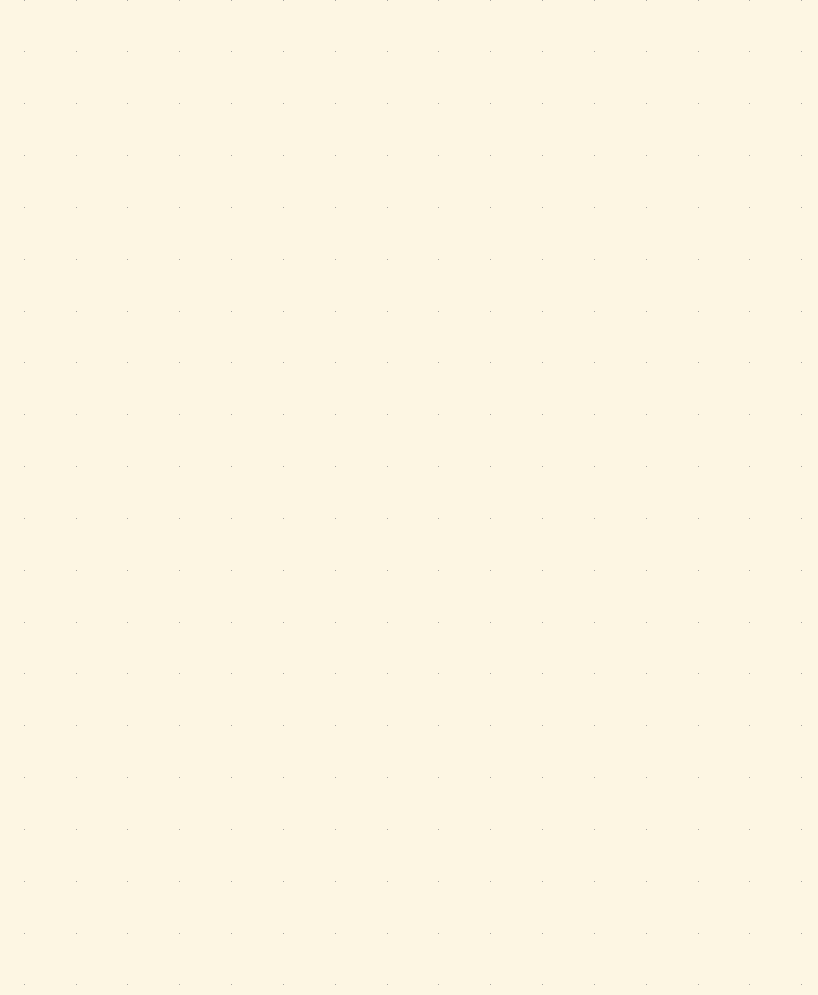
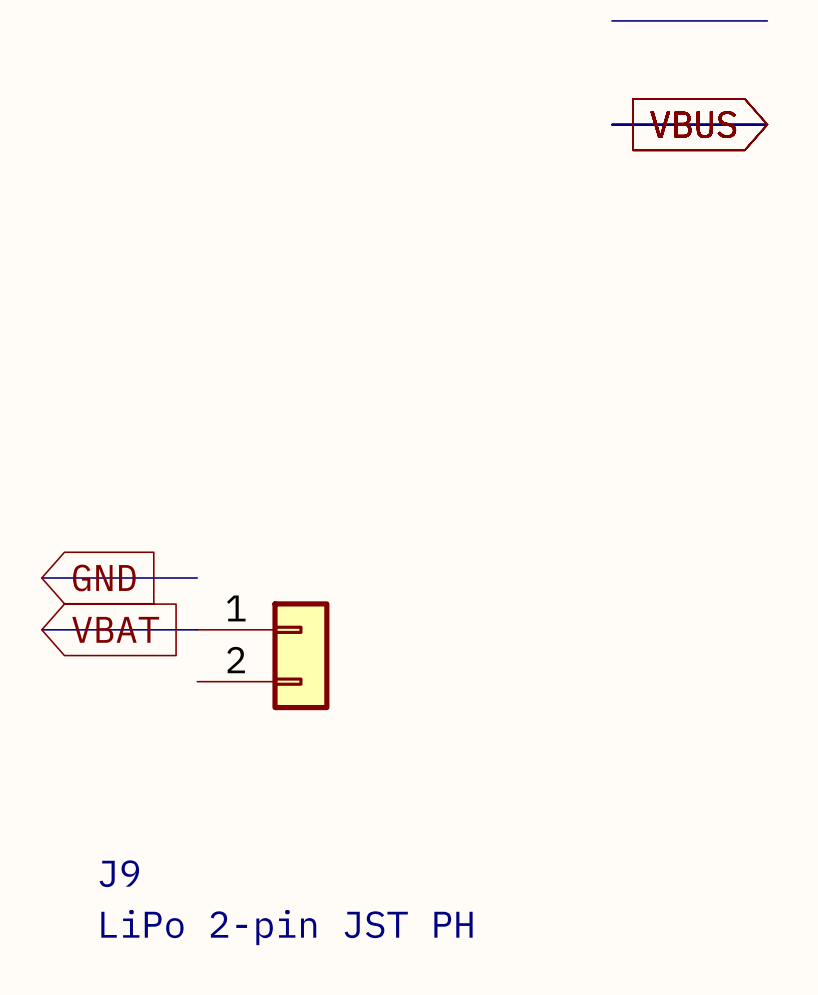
wire: none -> (611, 20) (767, 20)
wire: none -> (611, 124) (767, 124)
global label: none -> VBUS (693, 124)
wire: none -> (41, 577) (197, 577)
global label: none -> GND (104, 577)
wire: none -> (41, 629) (197, 629)
global label: none -> VBAT (115, 629)
J9: none -> LiPo 2-pin JST PH (263, 655)

